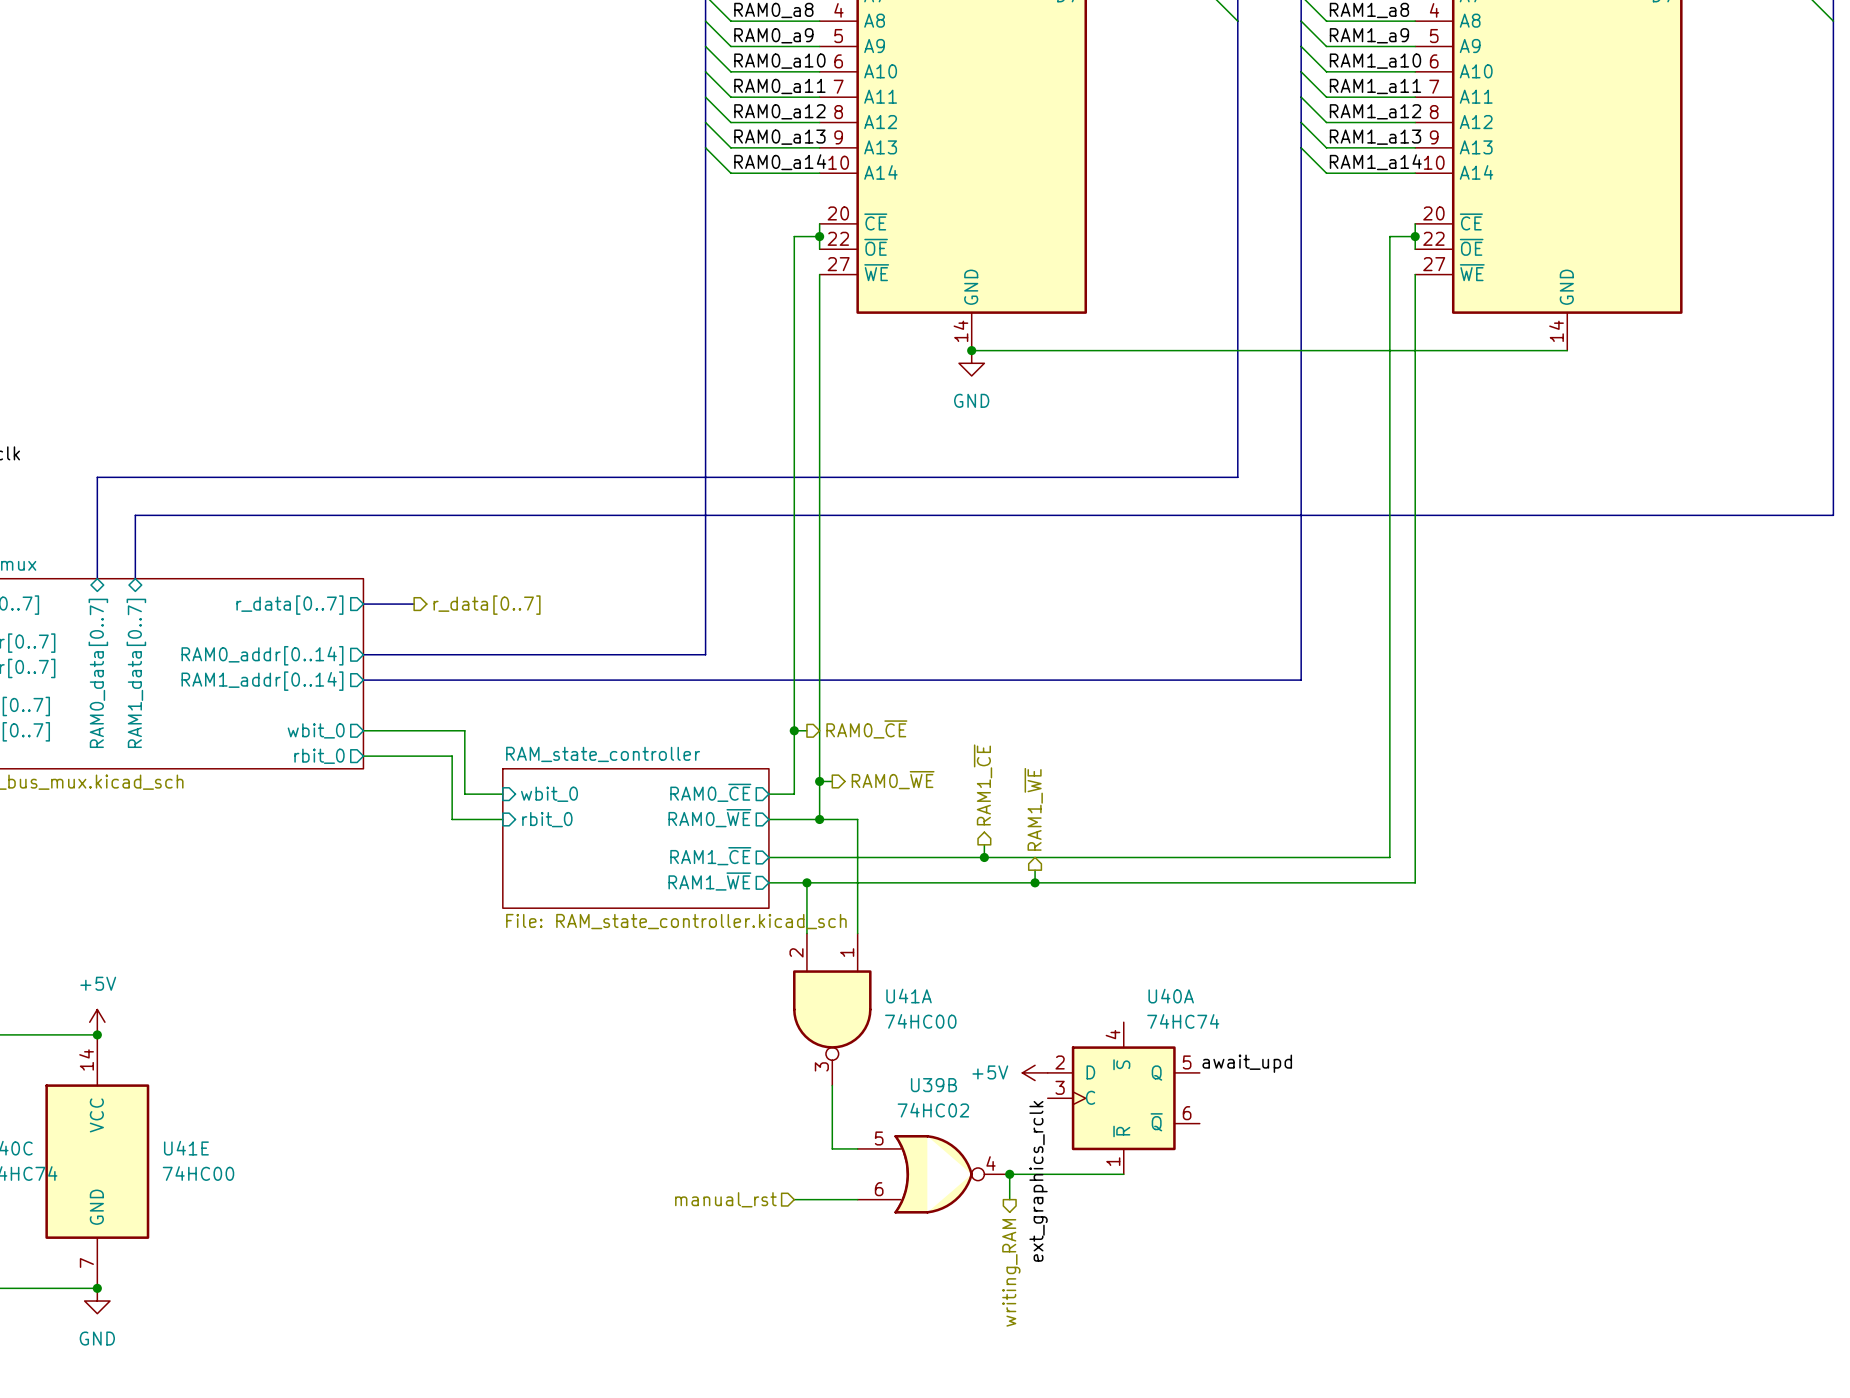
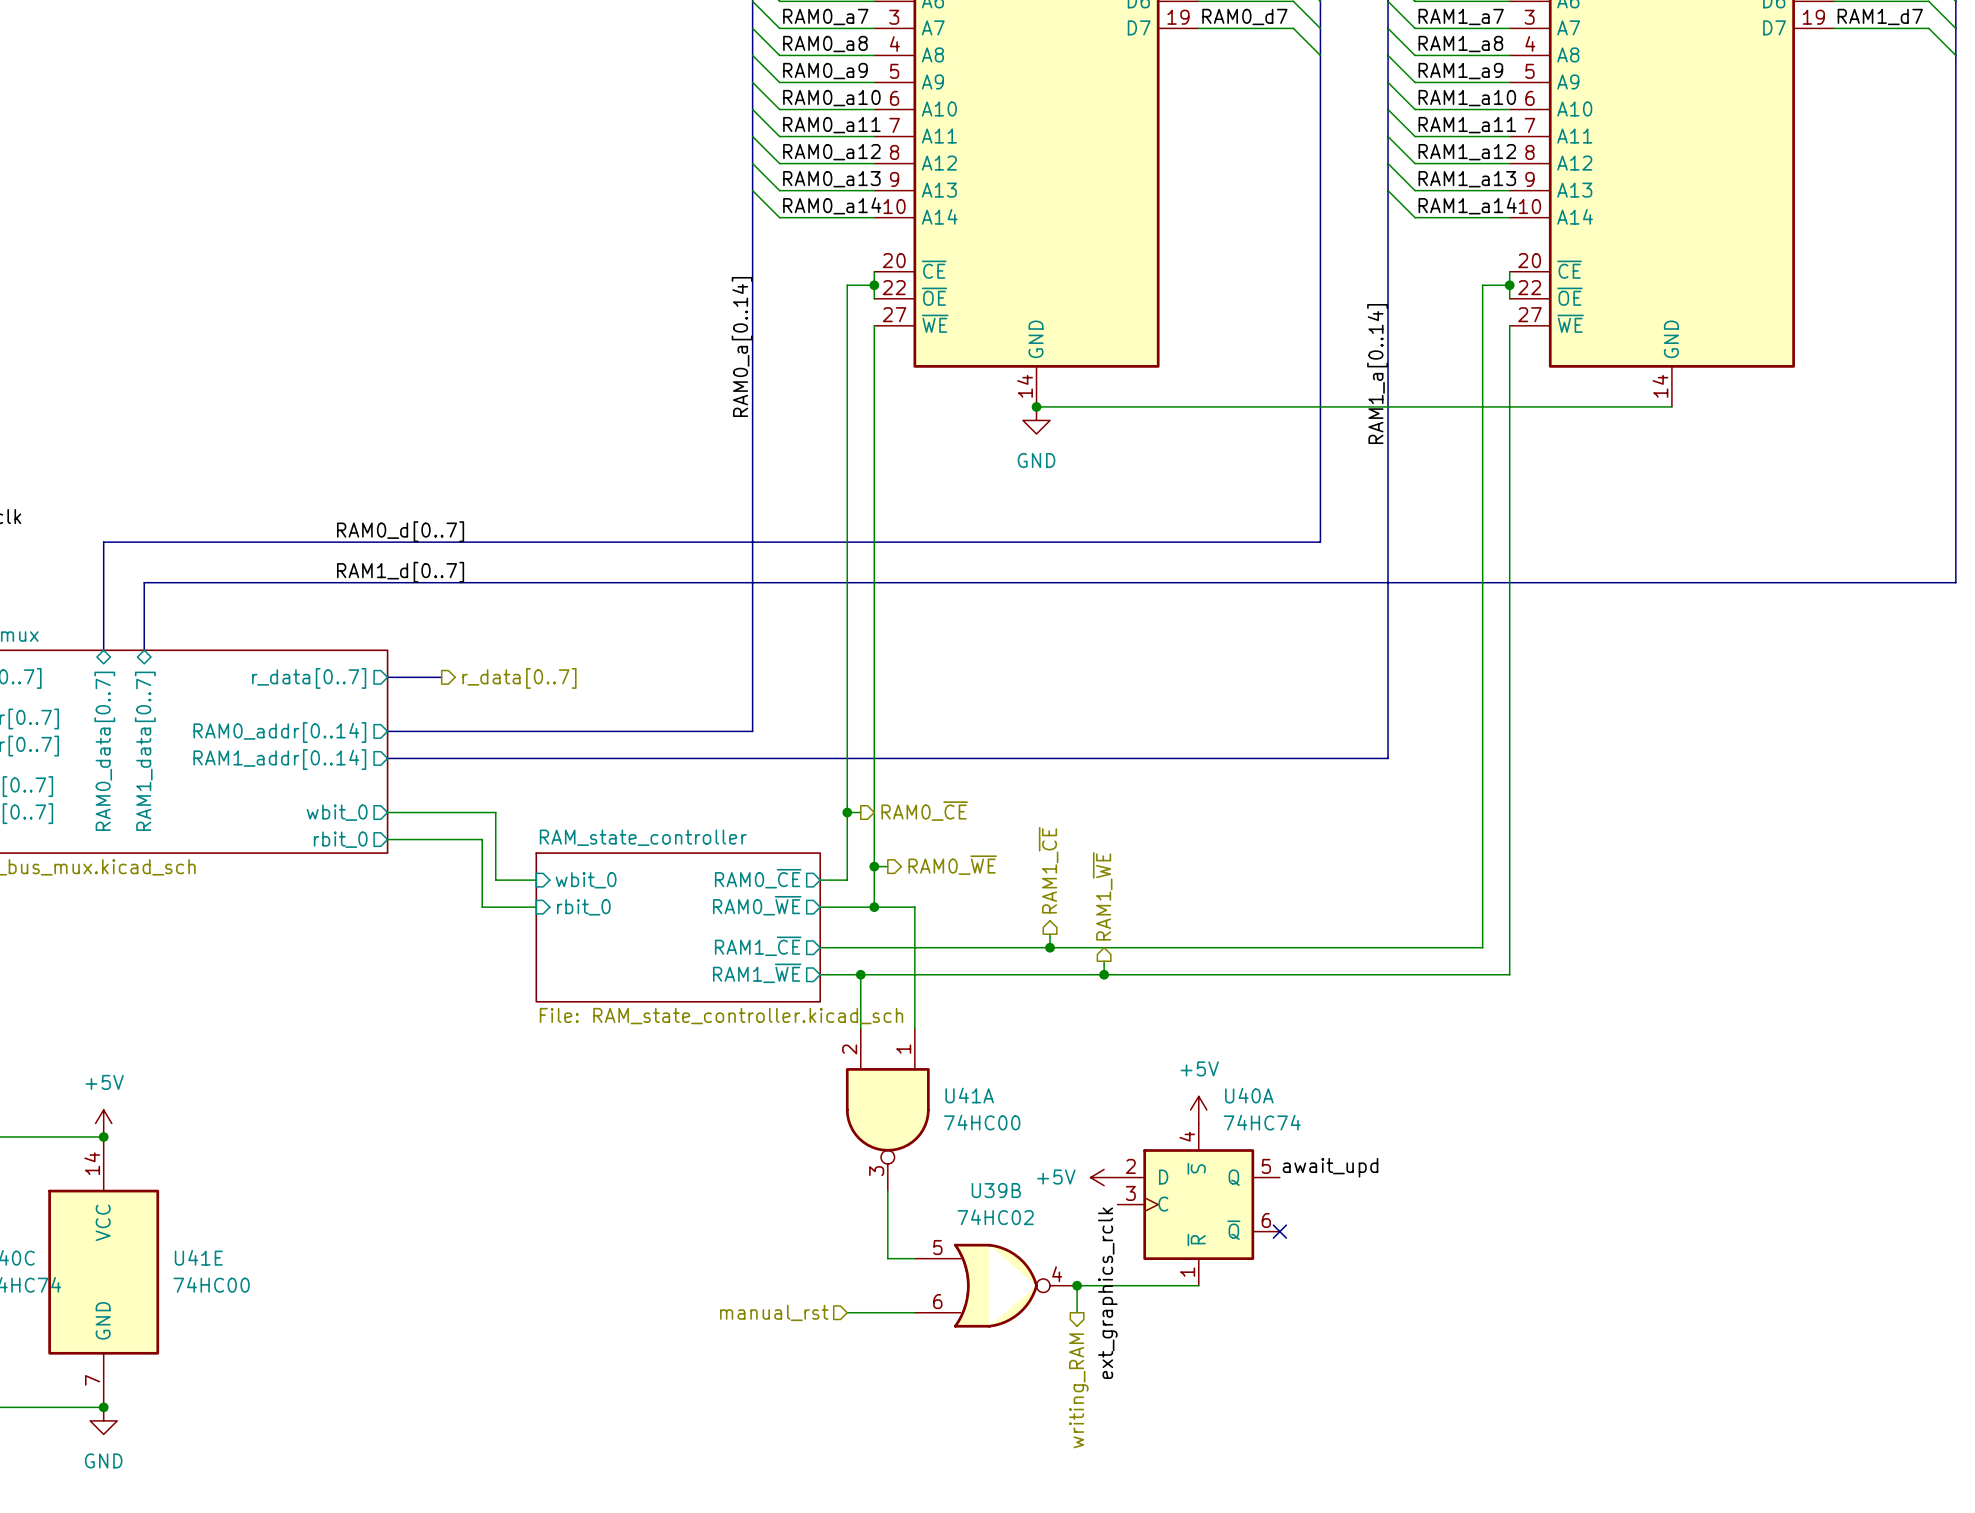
label: none -> RAM0_a[0..14] (742, 346)
label: none -> RAM1_a[0..14] (1377, 374)
label: none -> RAM0_d[0..7] (400, 531)
label: none -> RAM1_d[0..7] (400, 572)
power symbol: none -> +5V (1198, 1109)
no-connect mark: none -> (1279, 1231)

